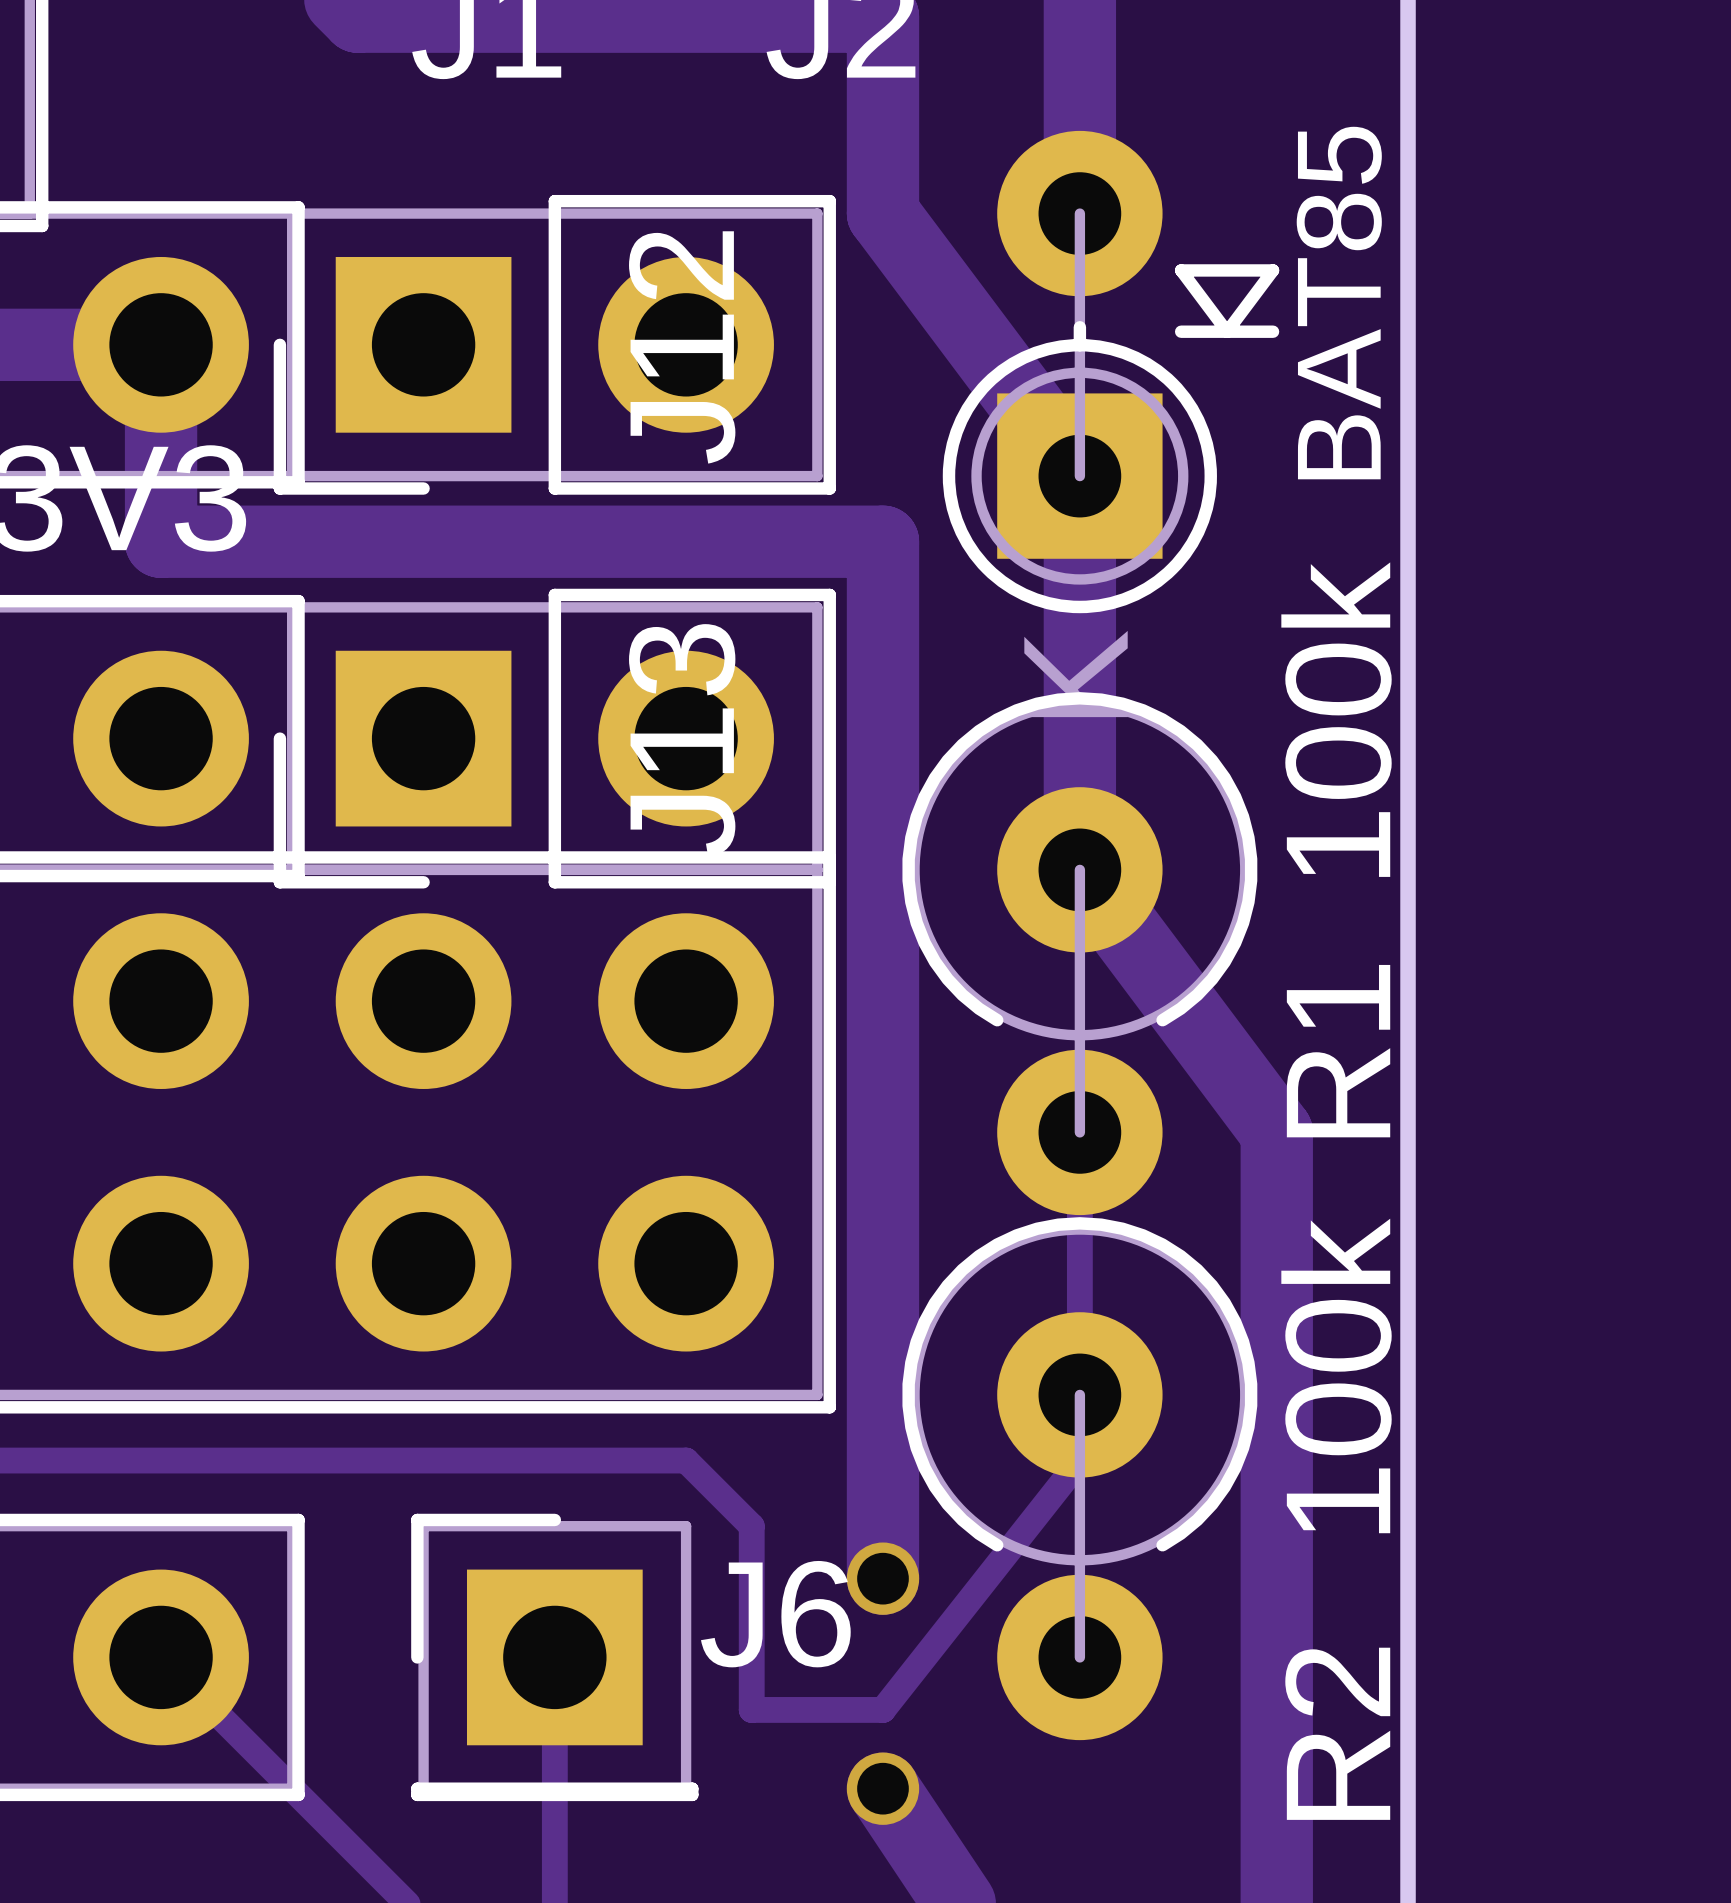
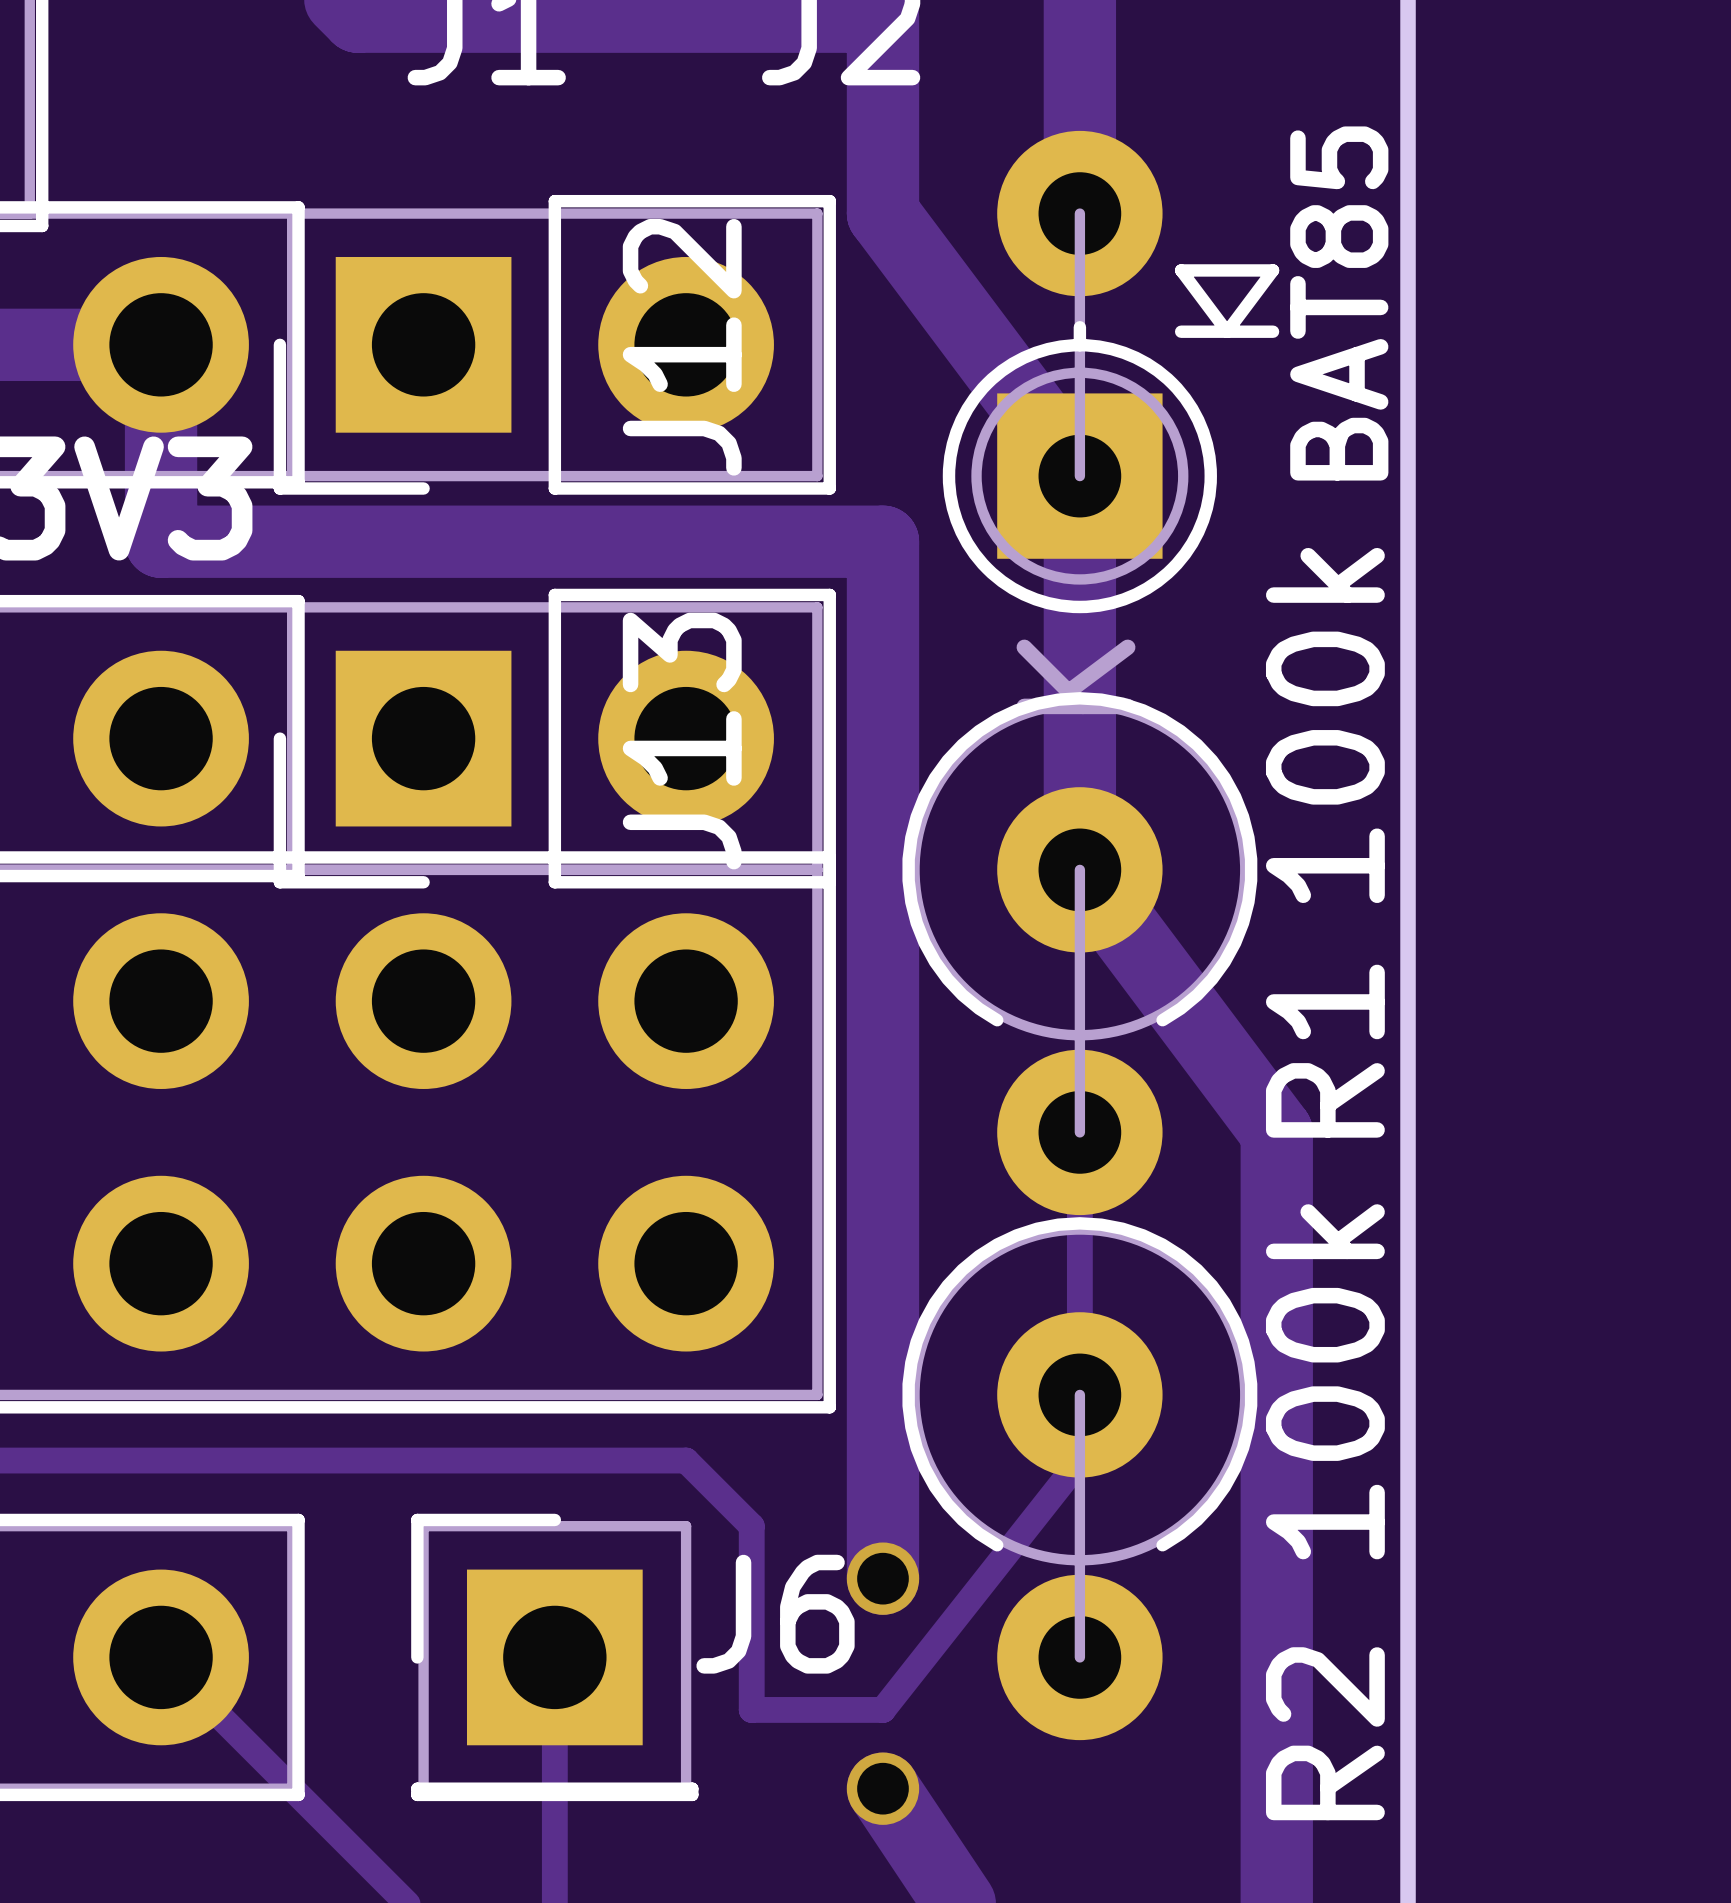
R1 value position: 100k (1336, 719) -> 100k (1325, 725)
R1 name position: R1 (1338, 1051) -> R1 (1325, 1051)
R2 value position: 100k (1336, 1375) -> 100k (1325, 1381)
R2 name position: R2 (1337, 1733) -> R2 (1325, 1733)

